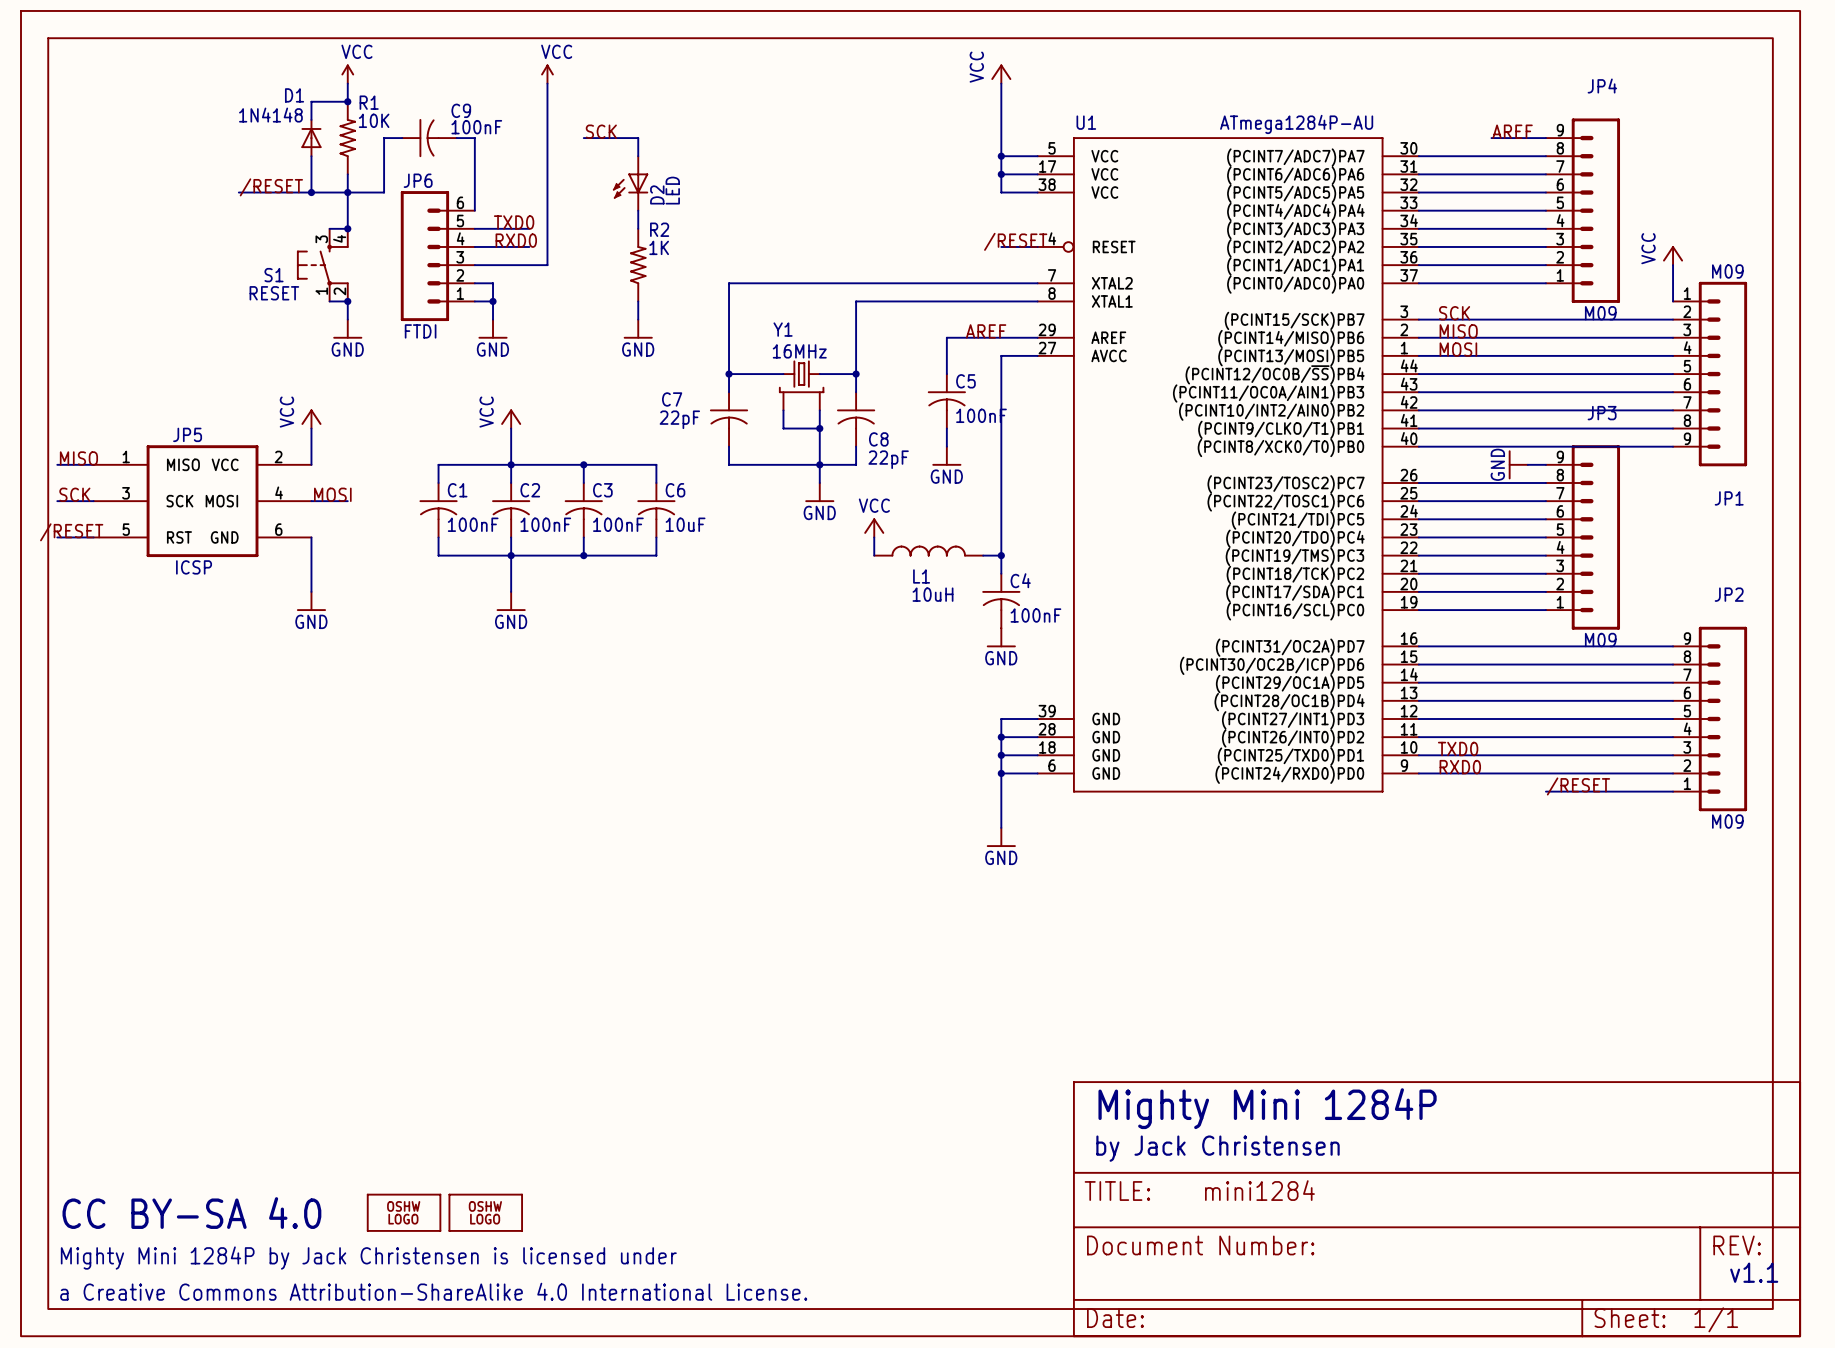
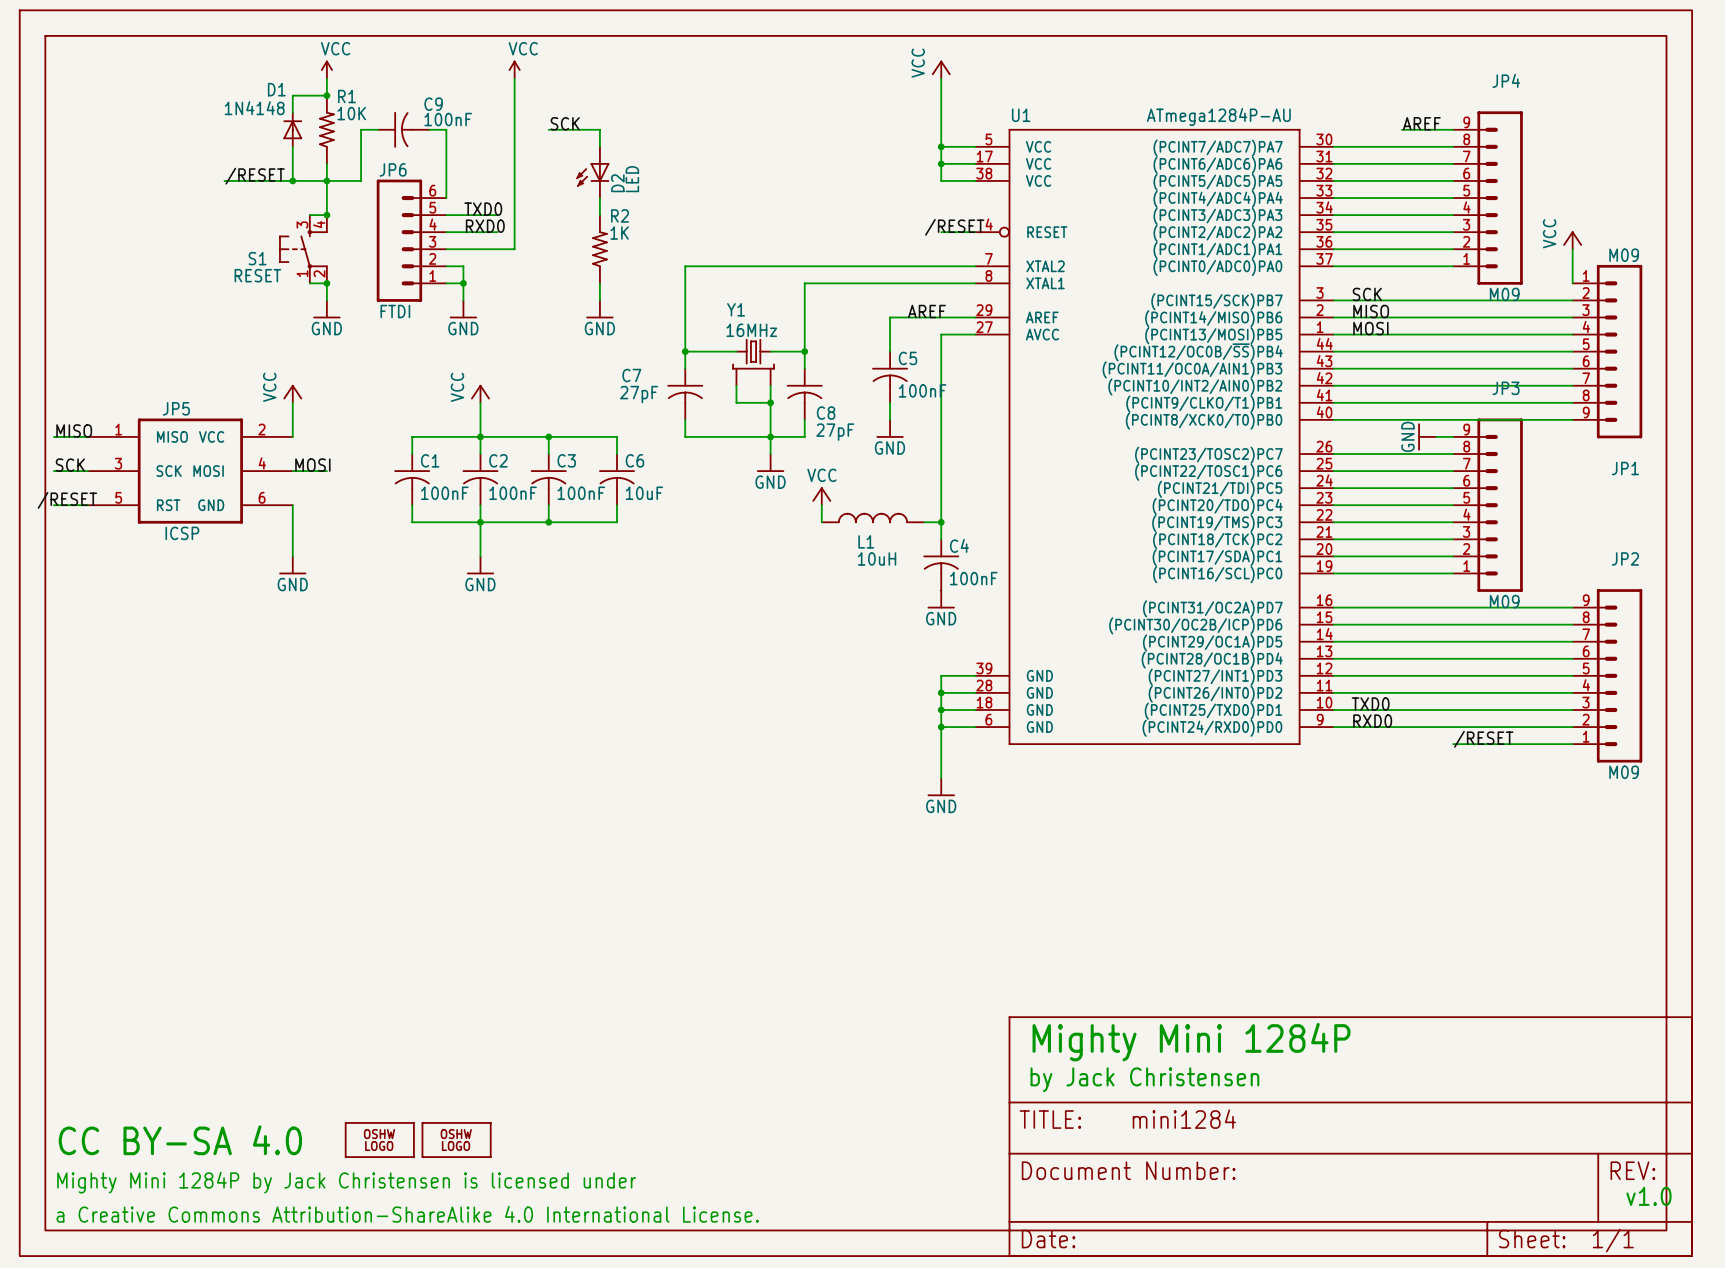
C7 value: 22pF (679, 419) -> 27pF (639, 394)
C8 value: 22pF (888, 459) -> 27pF (835, 432)
text: v1.1 (1754, 1272) -> v1.0 (1648, 1196)

